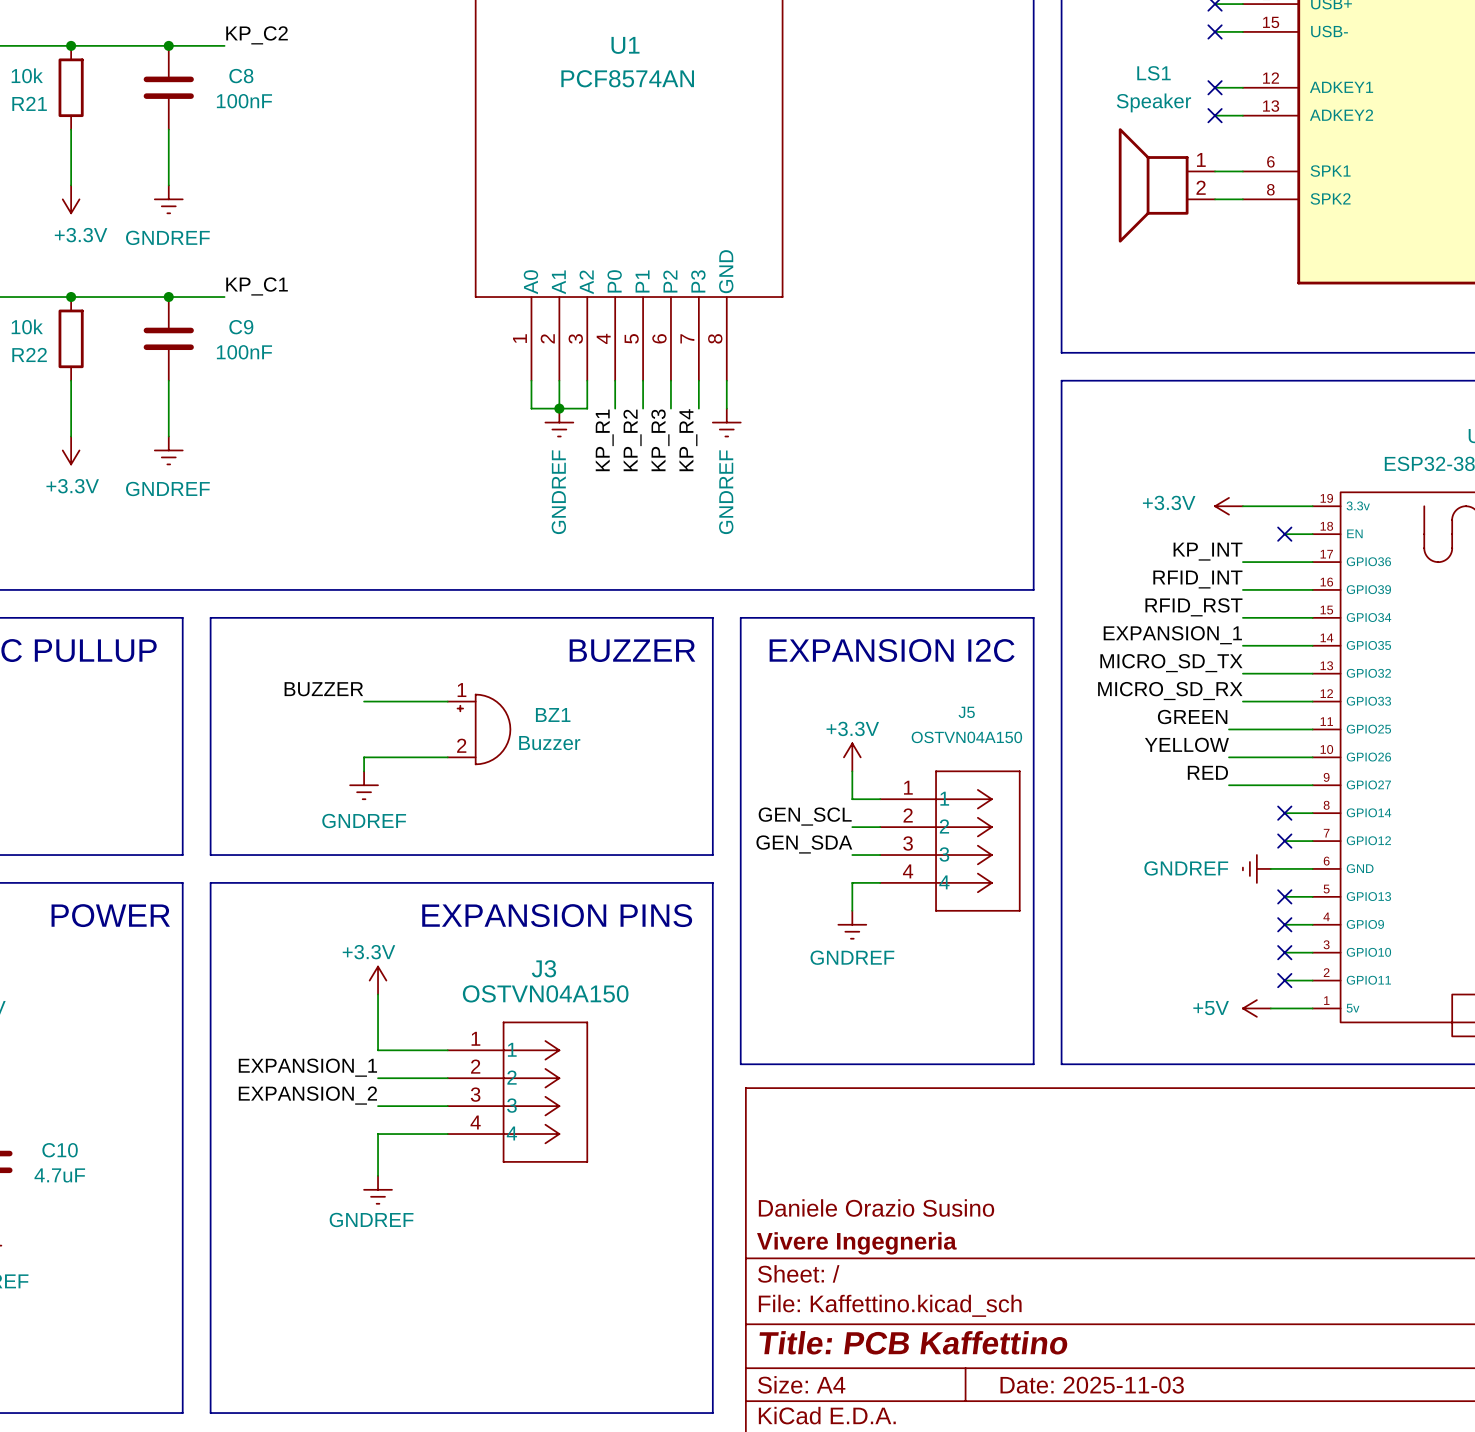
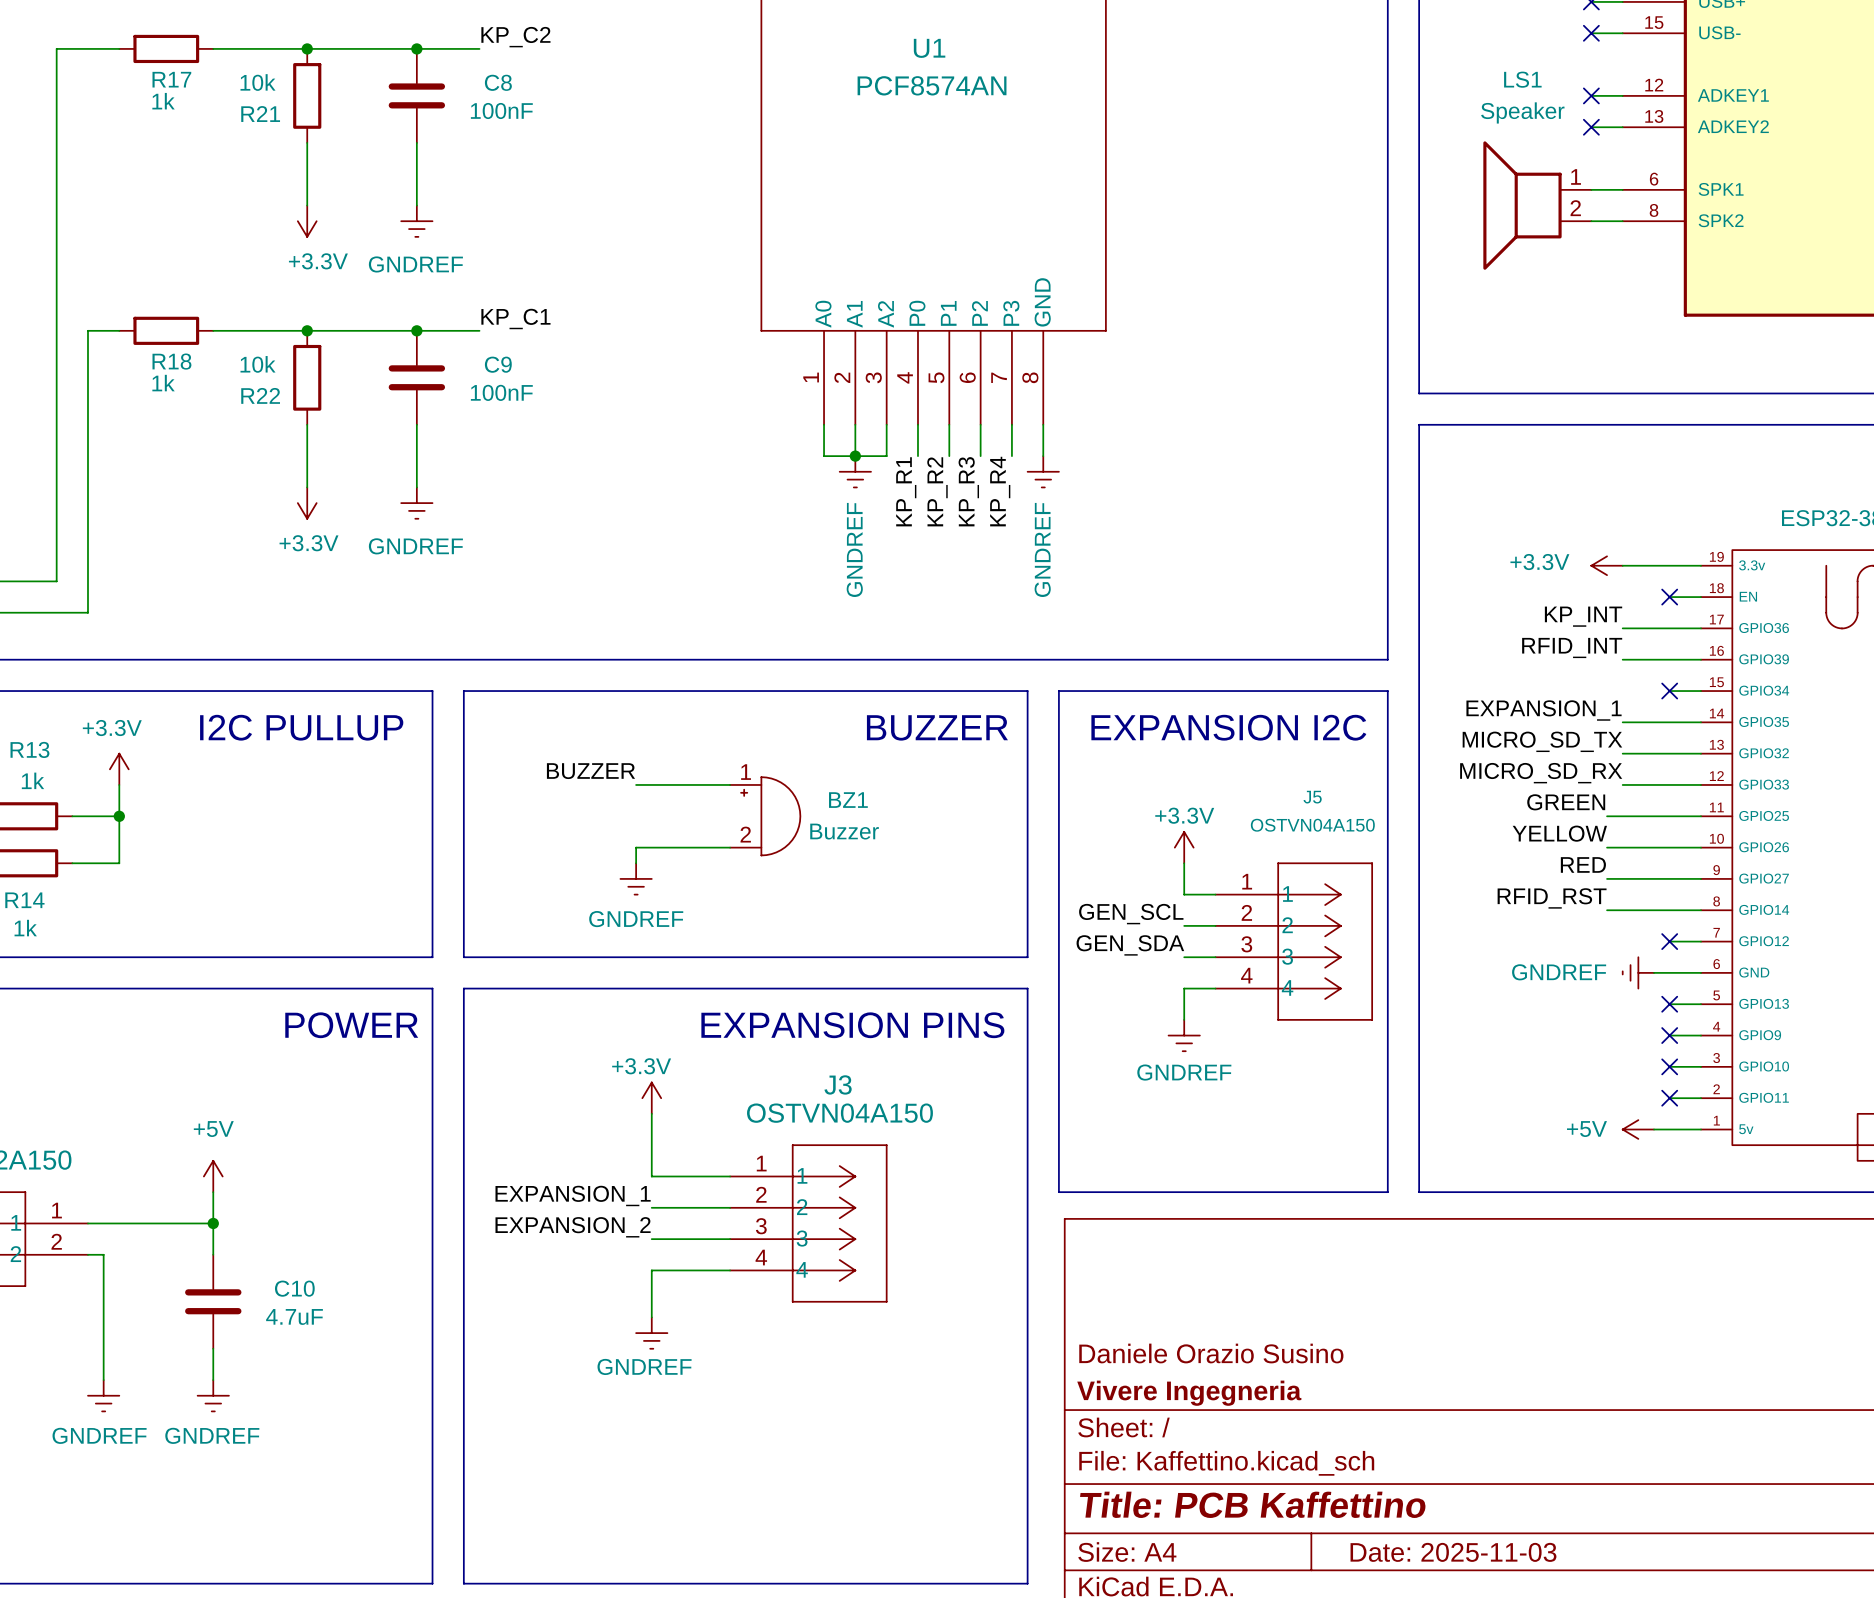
label position: RFID_RST (1193, 607) -> RFID_RST (1552, 898)
wire: (1242, 617) (1284, 617) -> none
no-connect mark: none -> (1669, 691)
wire: none -> (1607, 910) (1669, 910)
no-connect mark: (1284, 813) -> none

